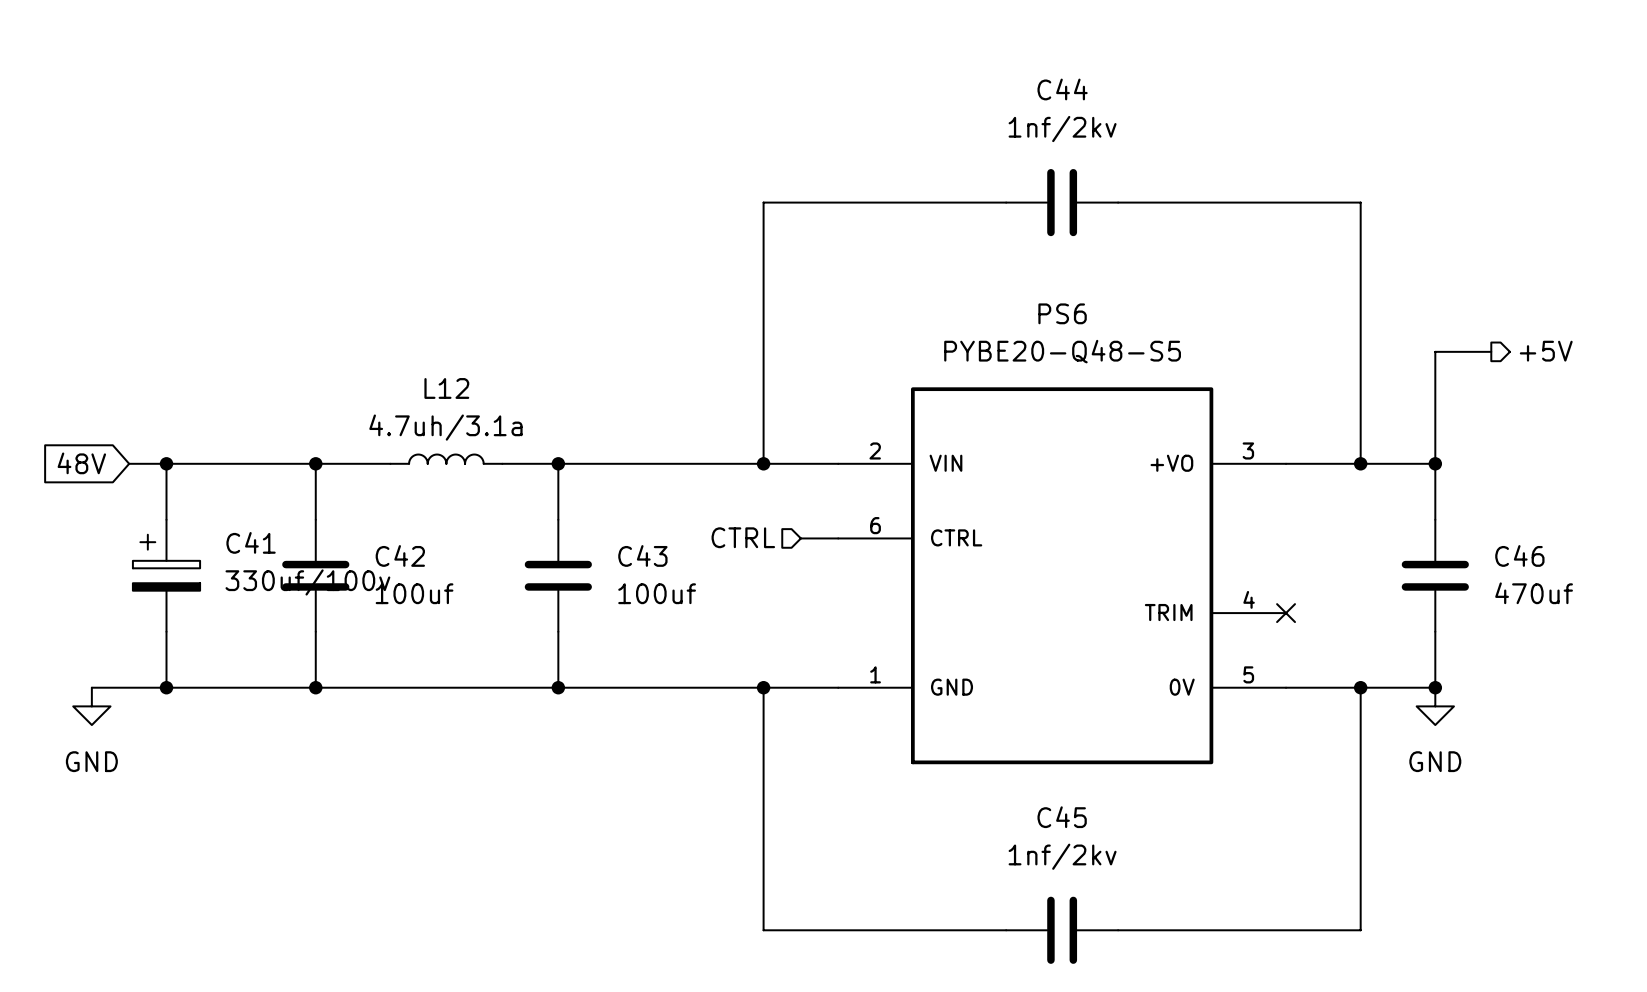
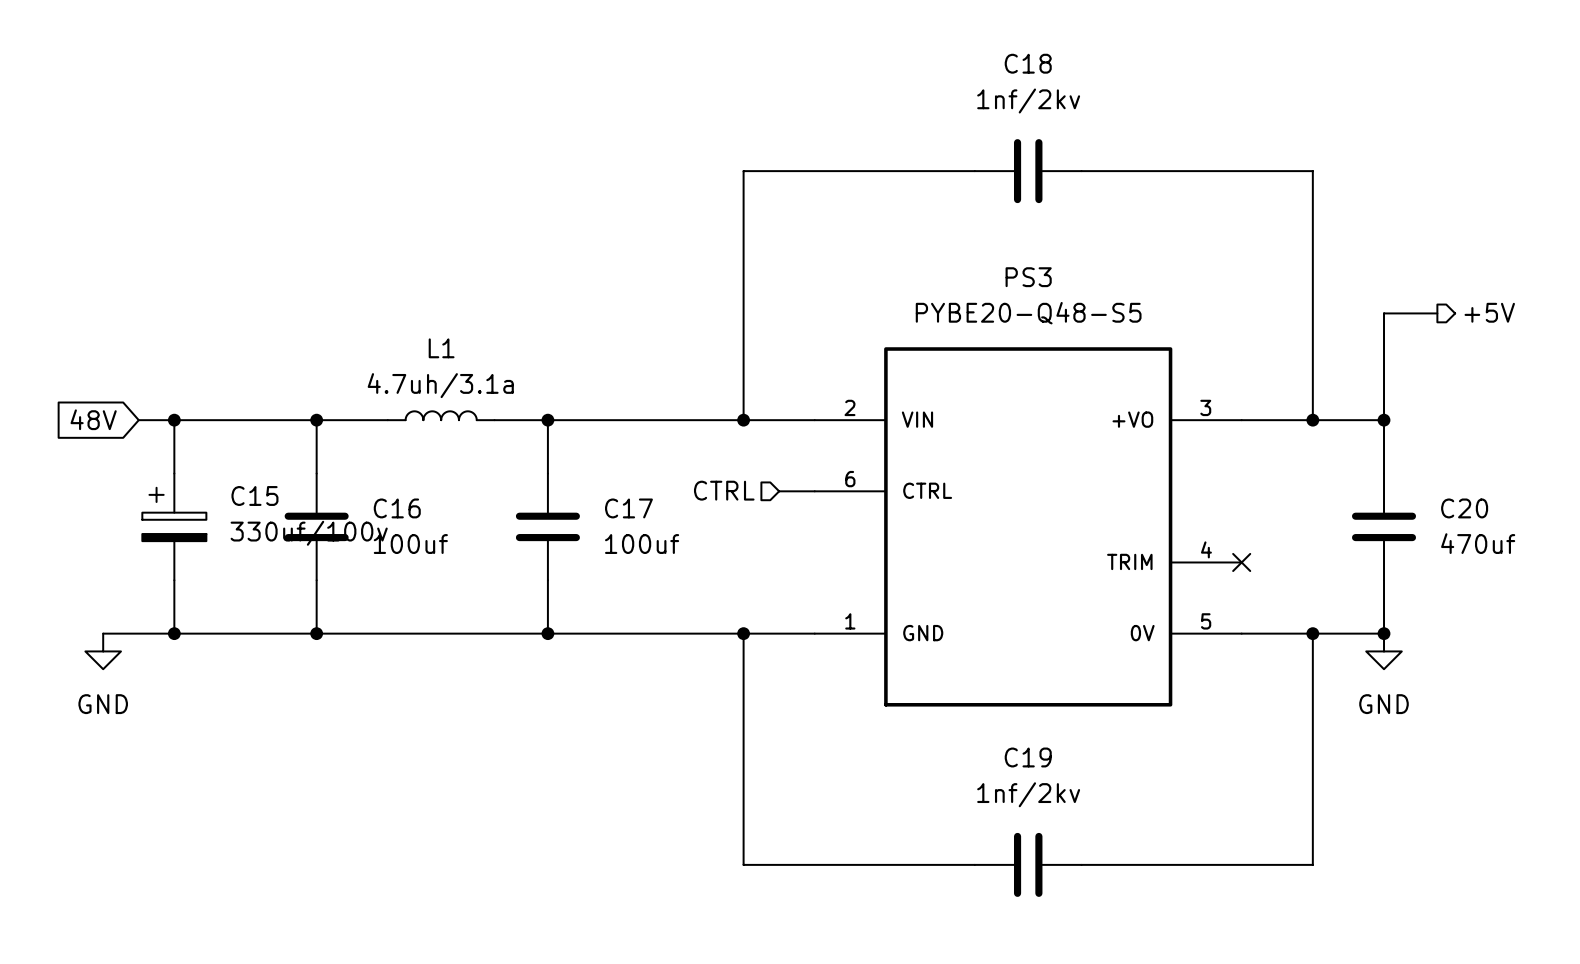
C44 name: C44 (1062, 89) -> C18 (1028, 63)
PS6 name: PS6 (1062, 313) -> PS3 (1028, 277)
L12 name: L12 (446, 388) -> L1 (441, 348)
C41 name: C41 (251, 542) -> C15 (254, 495)
C42 name: C42 (400, 555) -> C16 (397, 508)
C43 name: C43 (642, 555) -> C17 (628, 508)
C46 name: C46 (1519, 555) -> C20 (1464, 508)
C45 name: C45 (1062, 817) -> C19 (1028, 757)

